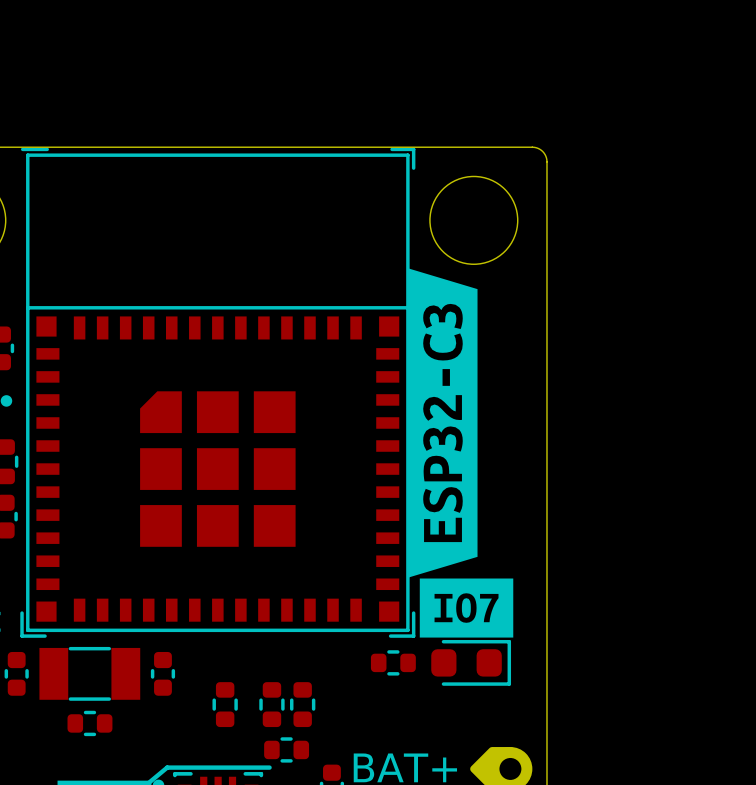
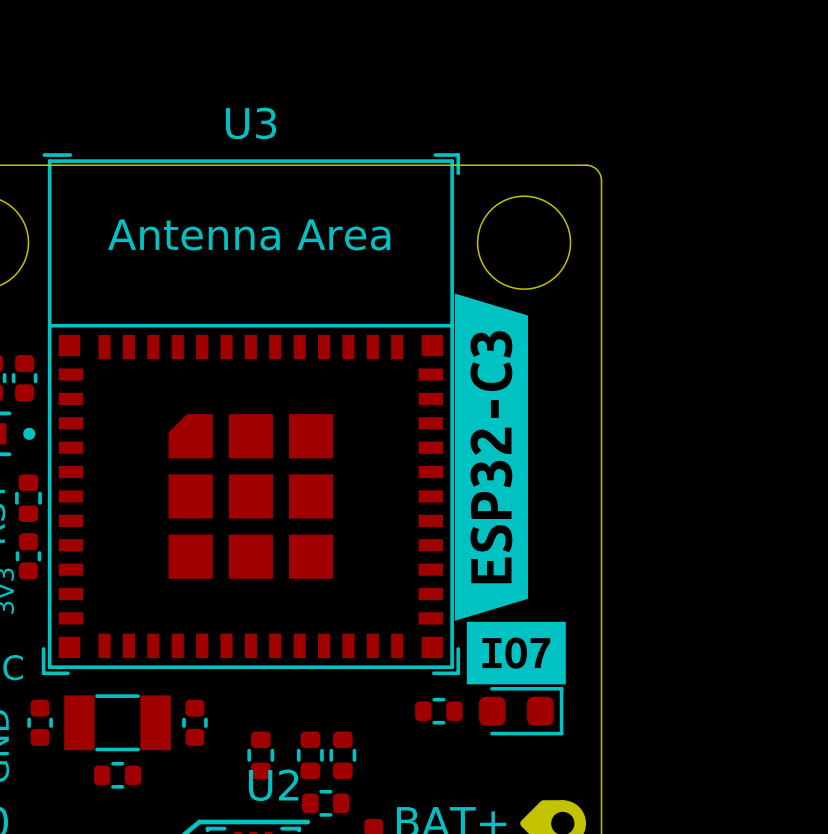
U3: none -> (250, 414)
part: (217, 392) -> none
U2 name: none -> U2 (273, 785)

